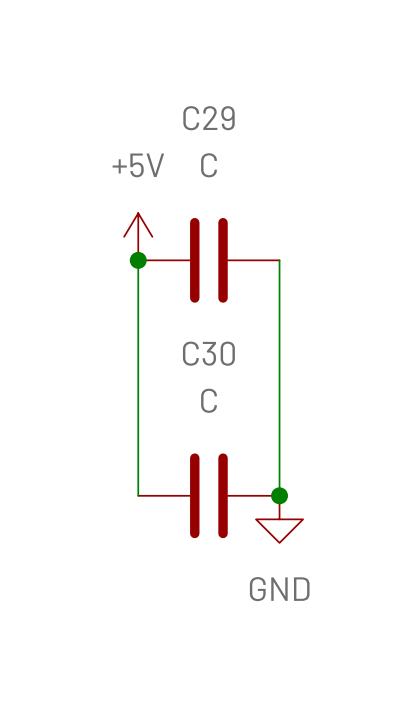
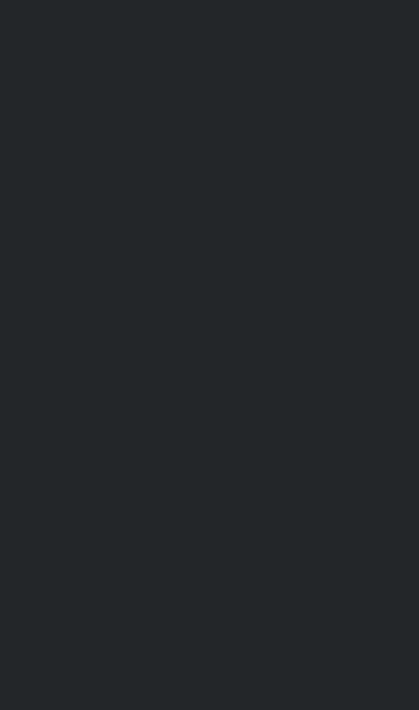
power symbol: +5V (138, 236) -> none
wire: (138, 260) (138, 495) -> none
junction: (138, 260) -> none
C29: C (208, 260) -> none
wire: (279, 260) (279, 495) -> none
C30: C (208, 495) -> none
junction: (279, 495) -> none
power symbol: GND (279, 519) -> none

